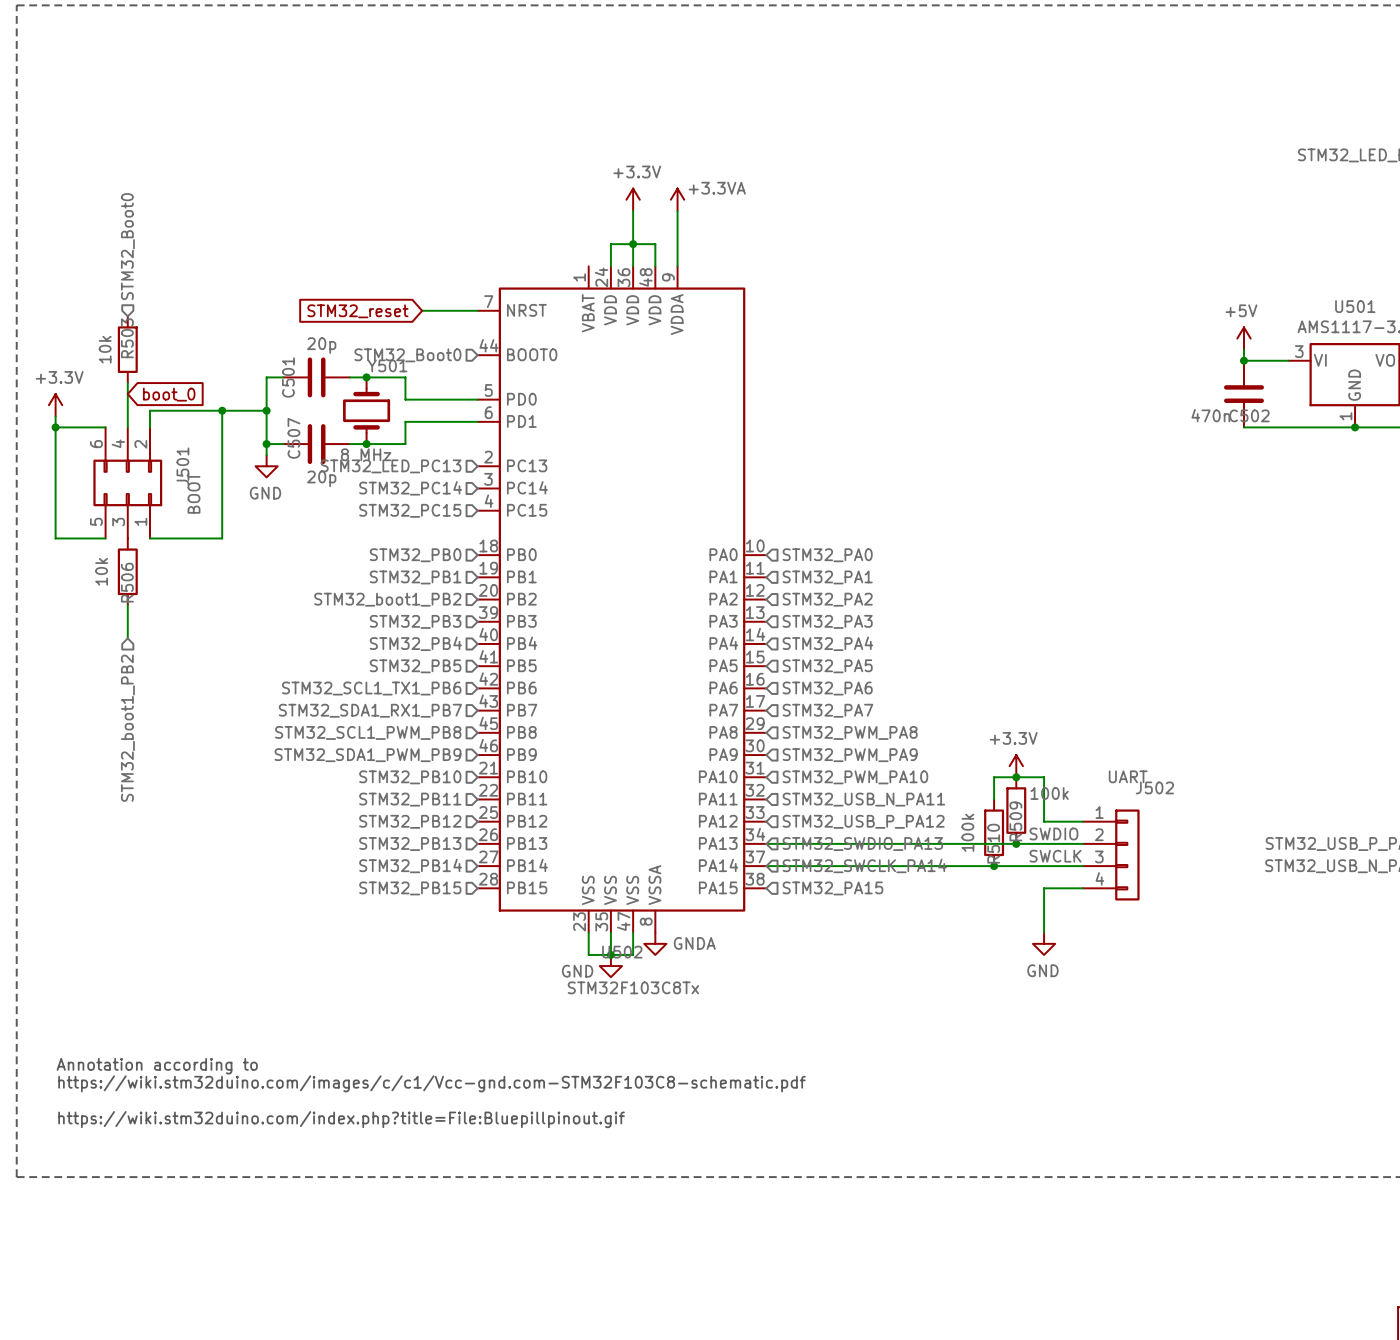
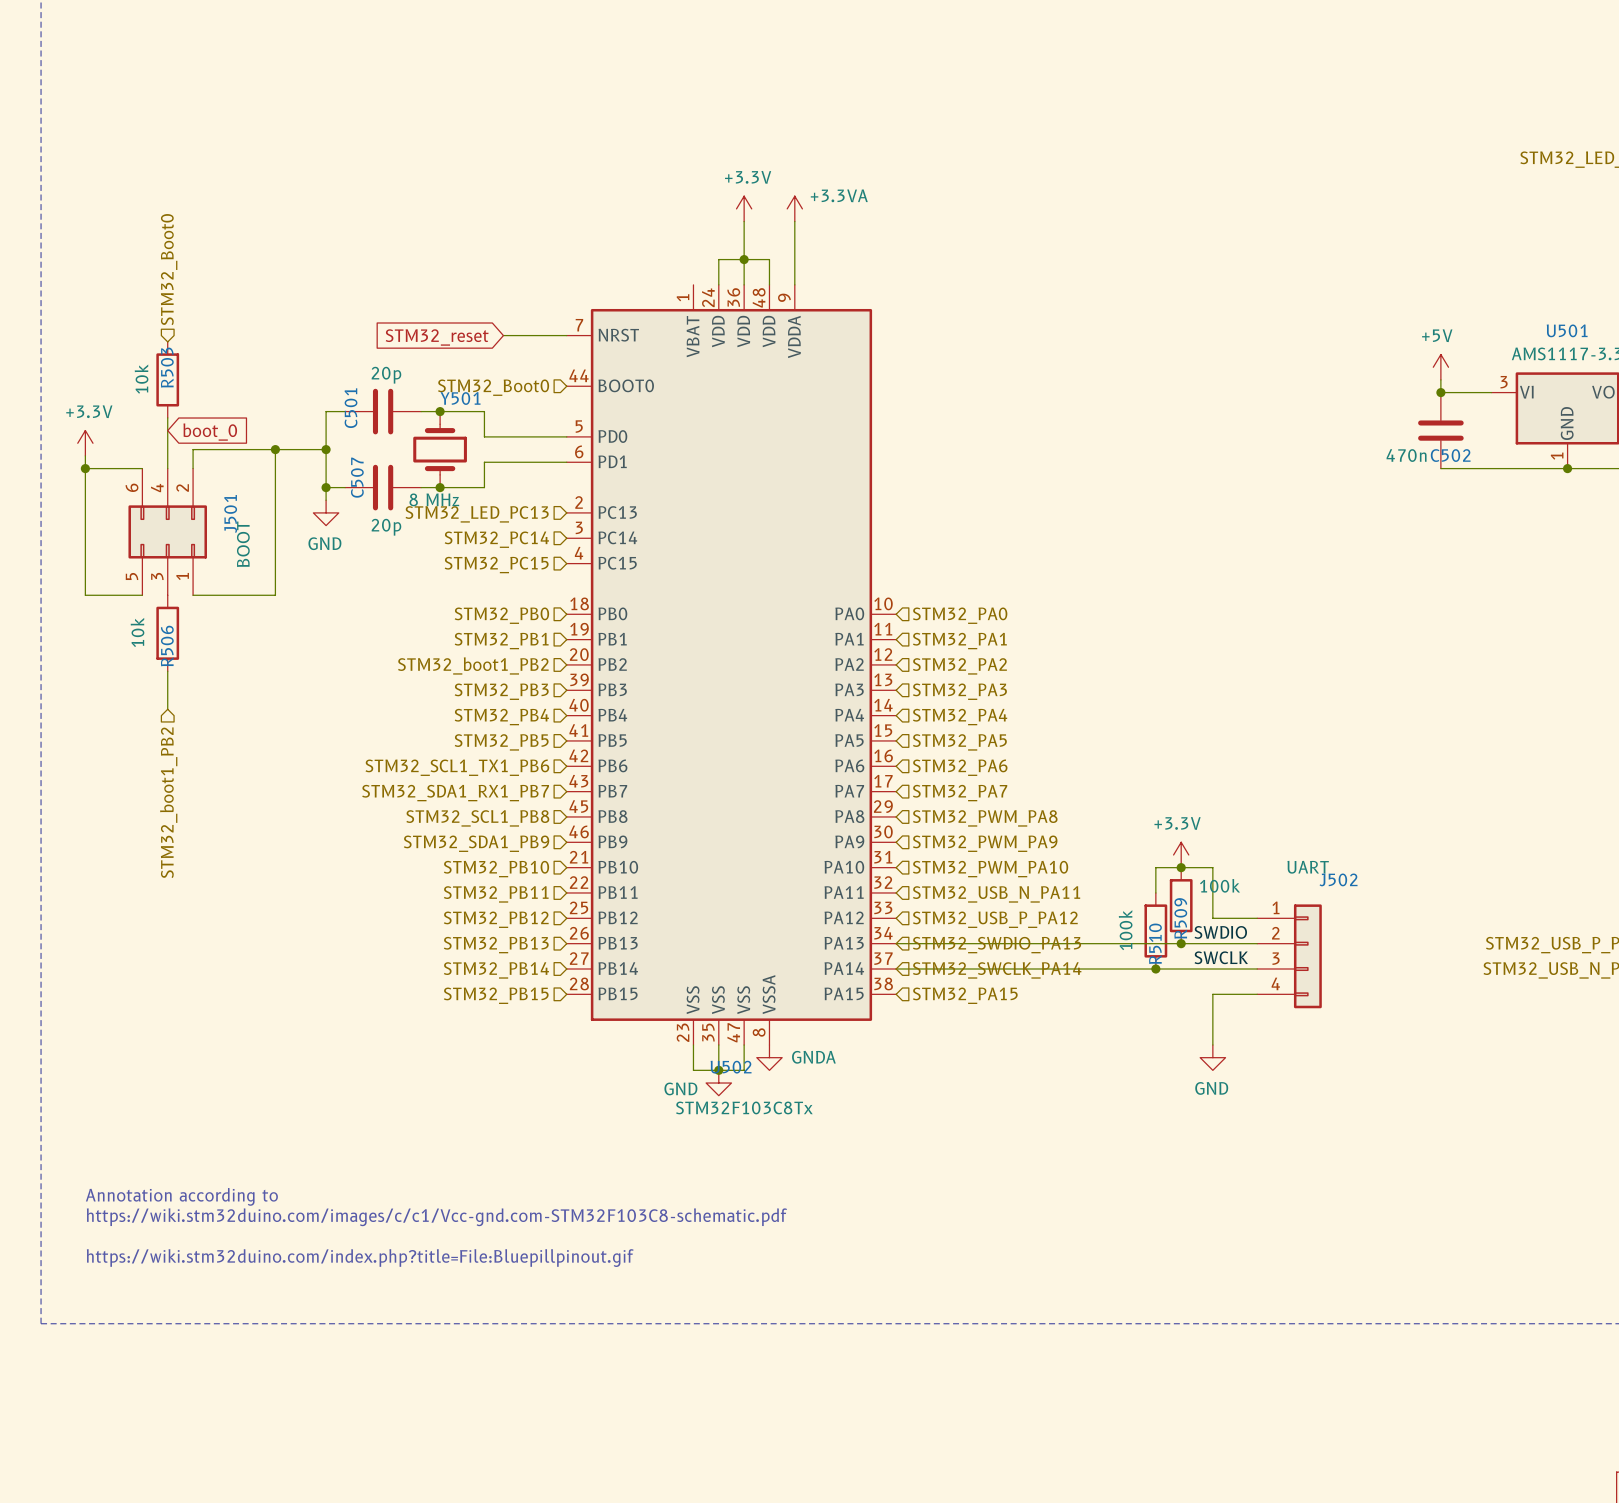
hierarchical label: STM32_SCL1_PWM_PB8 (368, 732) -> STM32_SCL1_PB8 (477, 818)
hierarchical label: STM32_SDA1_PWM_PB9 (367, 755) -> STM32_SDA1_PB9 (476, 843)

